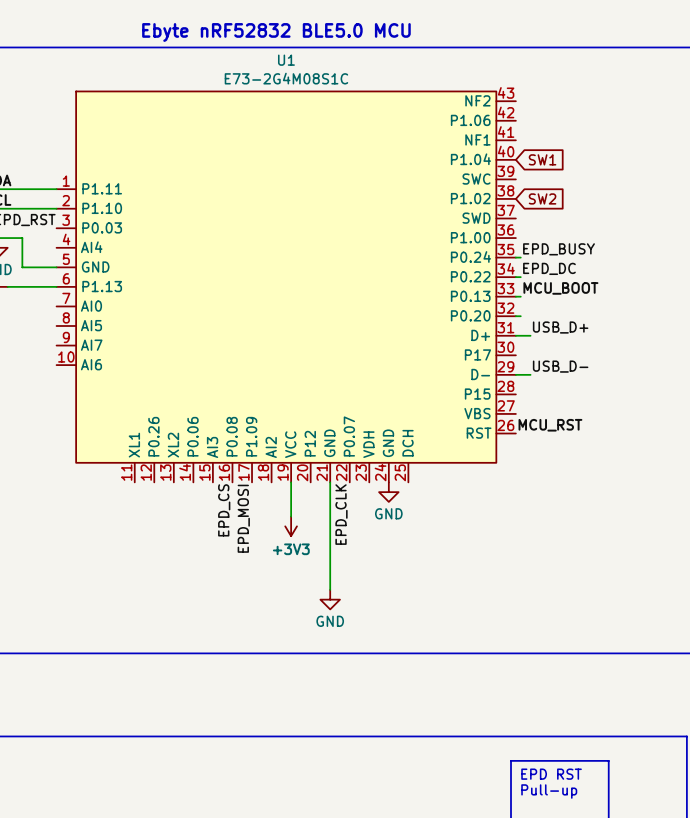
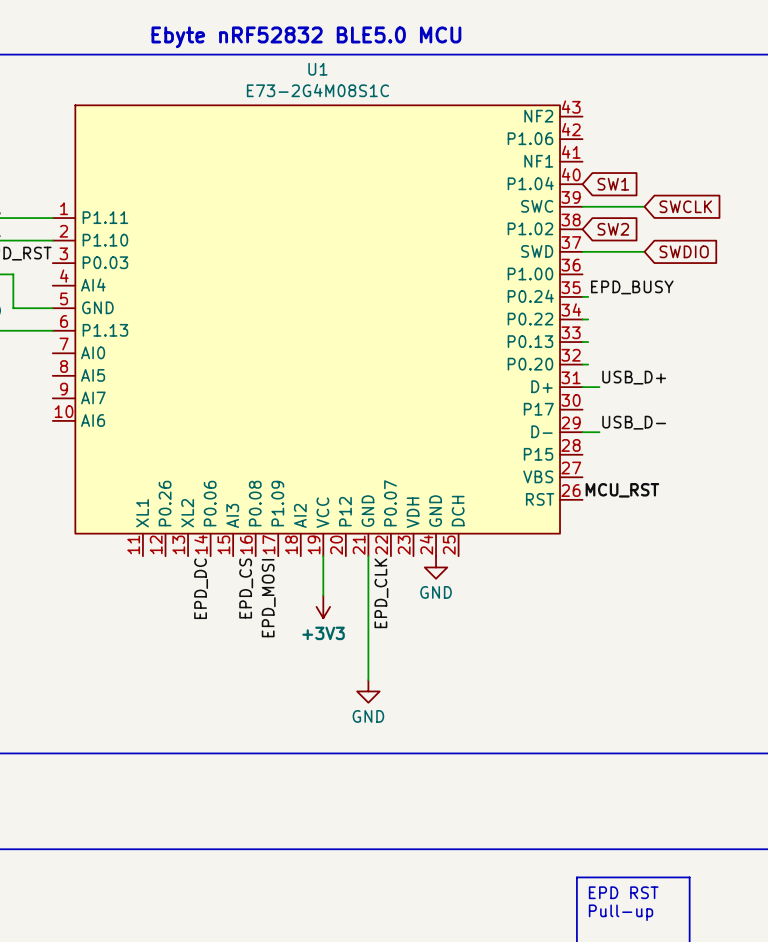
wire: none -> (582, 206) (644, 206)
global label: none -> SWCLK (685, 206)
wire: none -> (582, 251) (644, 251)
global label: none -> SWDIO (684, 251)
label: EPD_DC (549, 268) -> none
label: MCU_BOOT (560, 288) -> none
label: none -> EPD_DC (201, 588)

